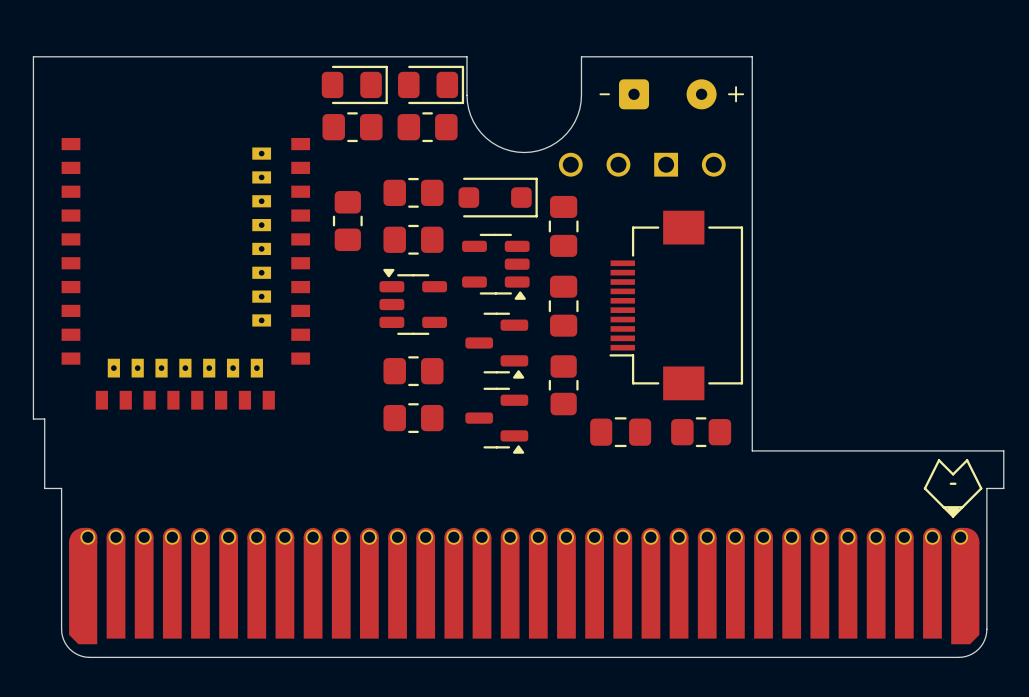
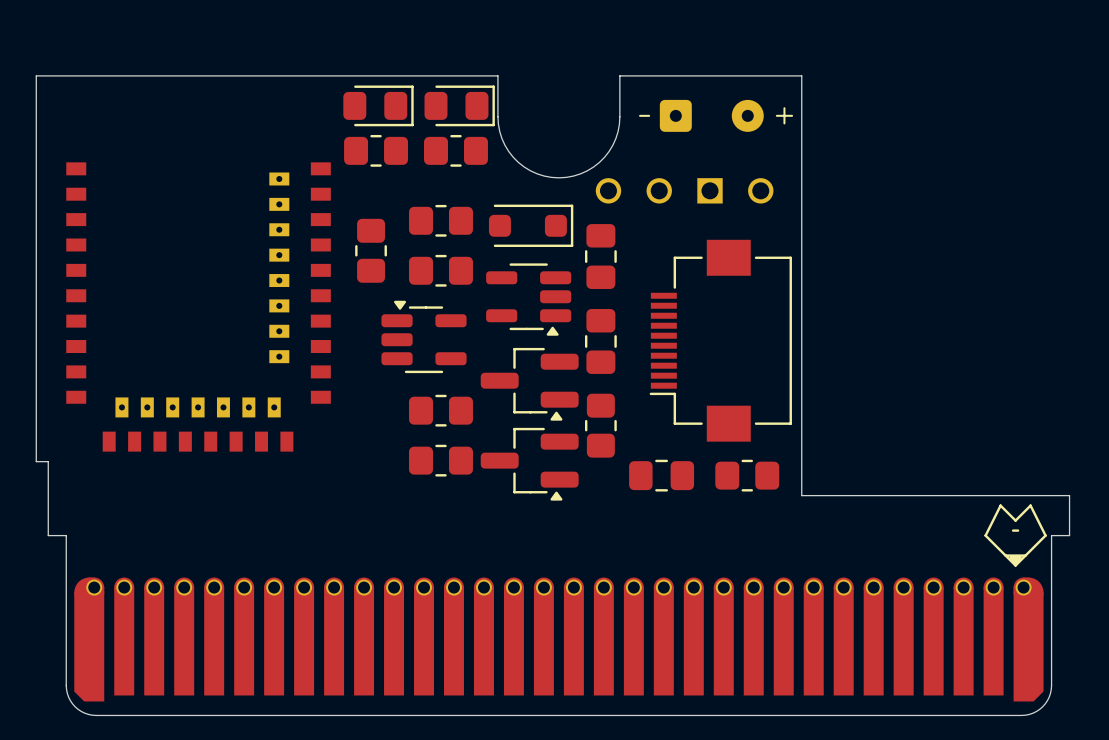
part footprint: [462, 233, 530, 300] -> [486, 263, 572, 336]
part footprint: [379, 268, 448, 335] -> [381, 300, 467, 374]
part footprint: [465, 312, 529, 379] -> [480, 347, 579, 421]
part footprint: [465, 387, 529, 454] -> [480, 427, 579, 501]

